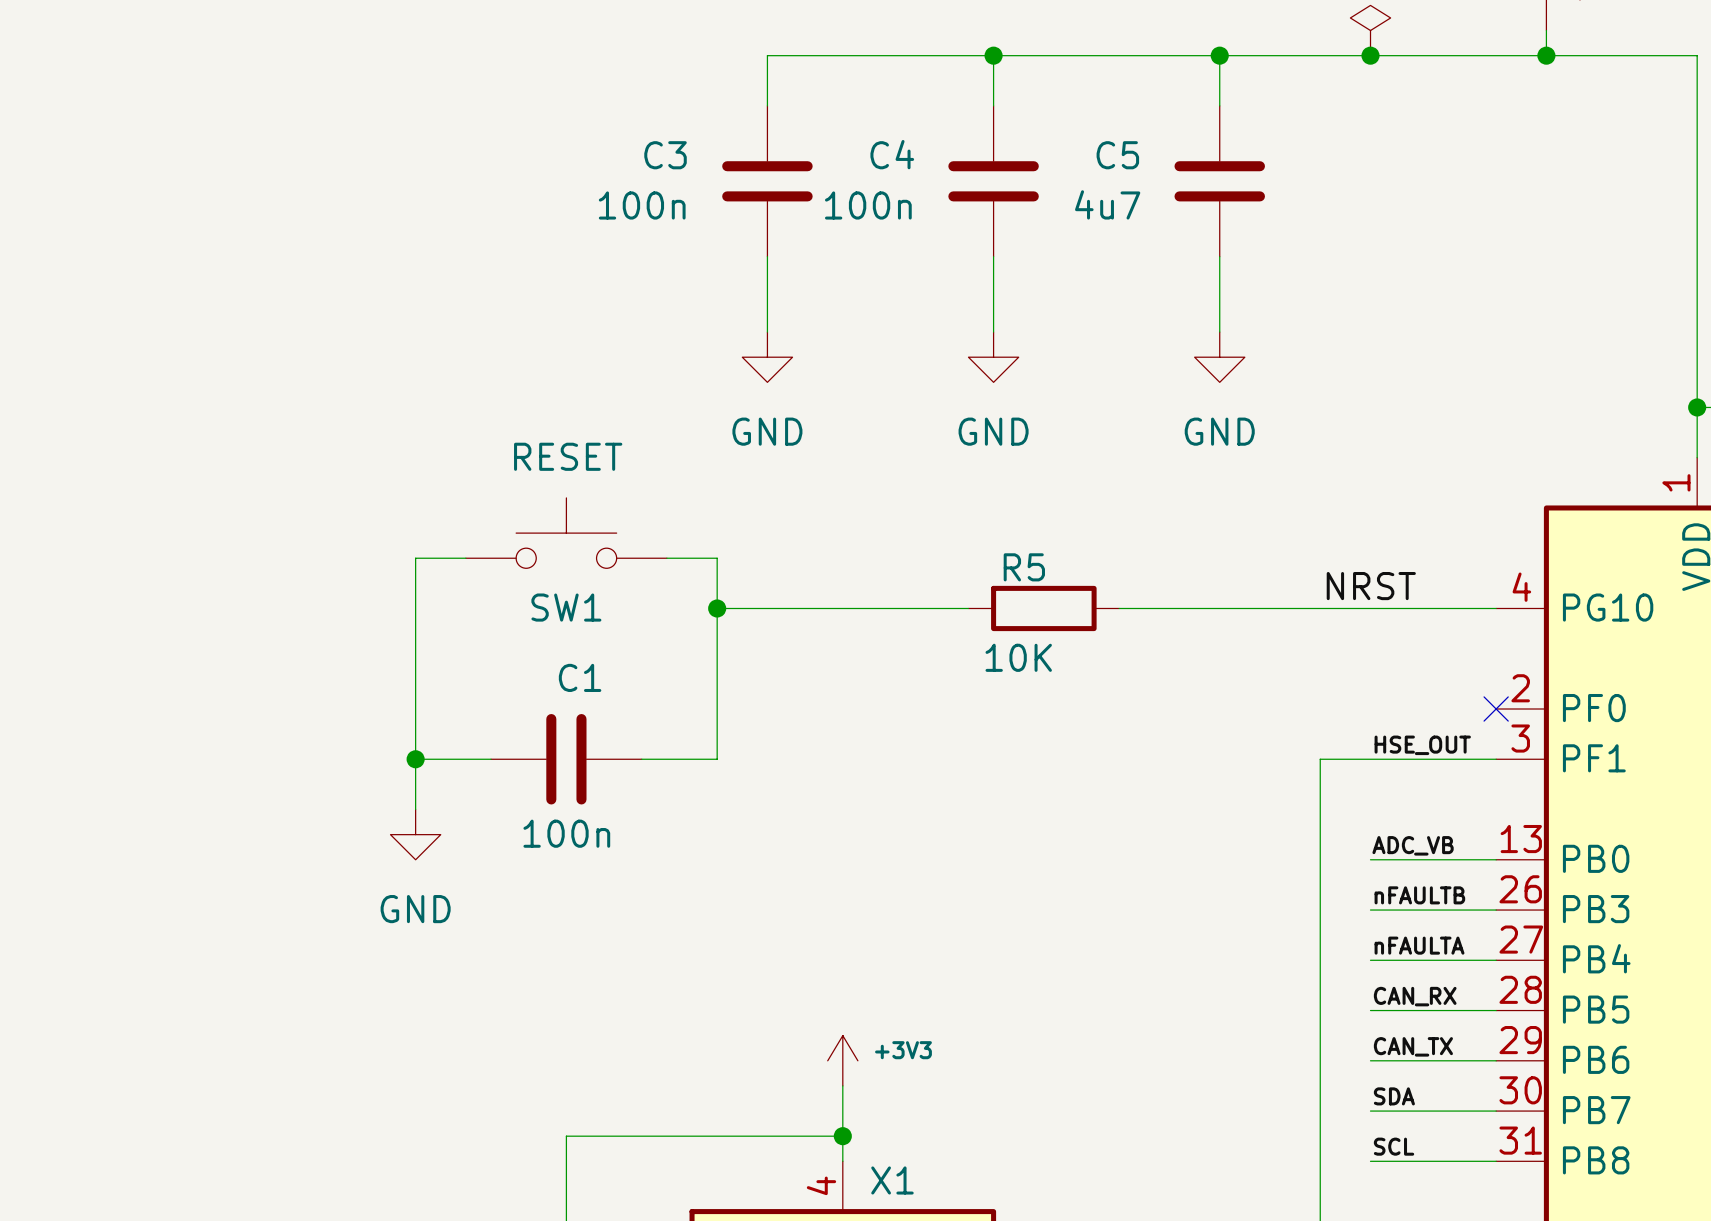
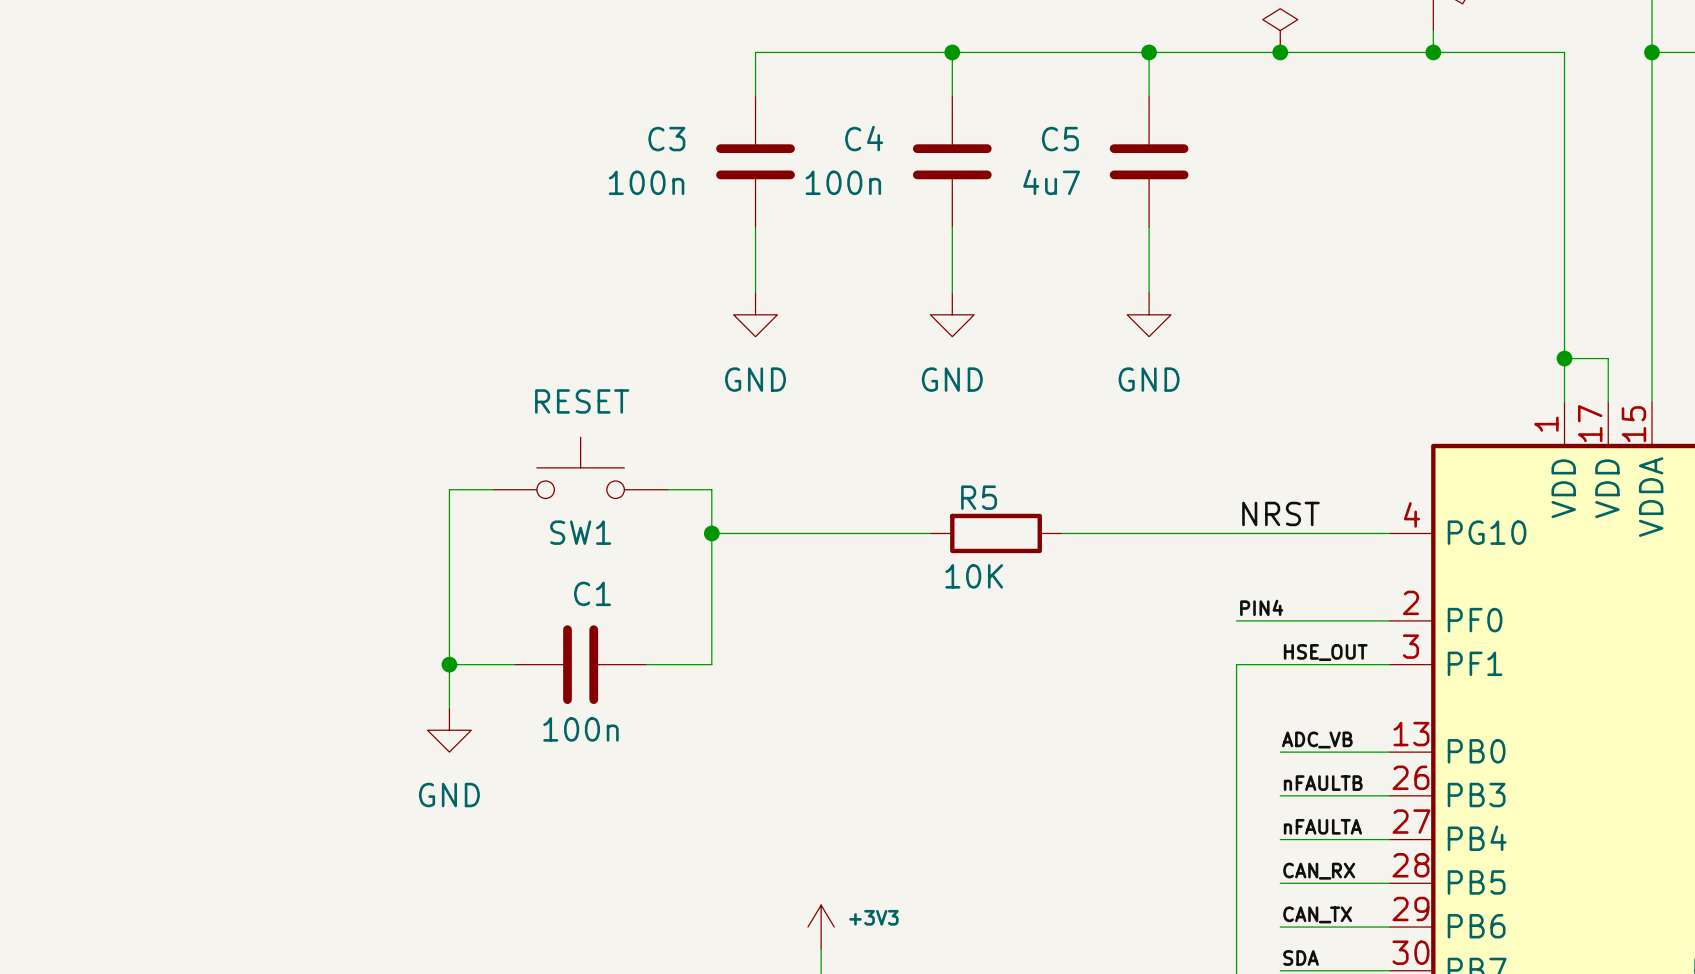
label: none -> PIN4 (1261, 607)
wire: none -> (1236, 620) (1389, 620)
no-connect mark: (1496, 709) -> none

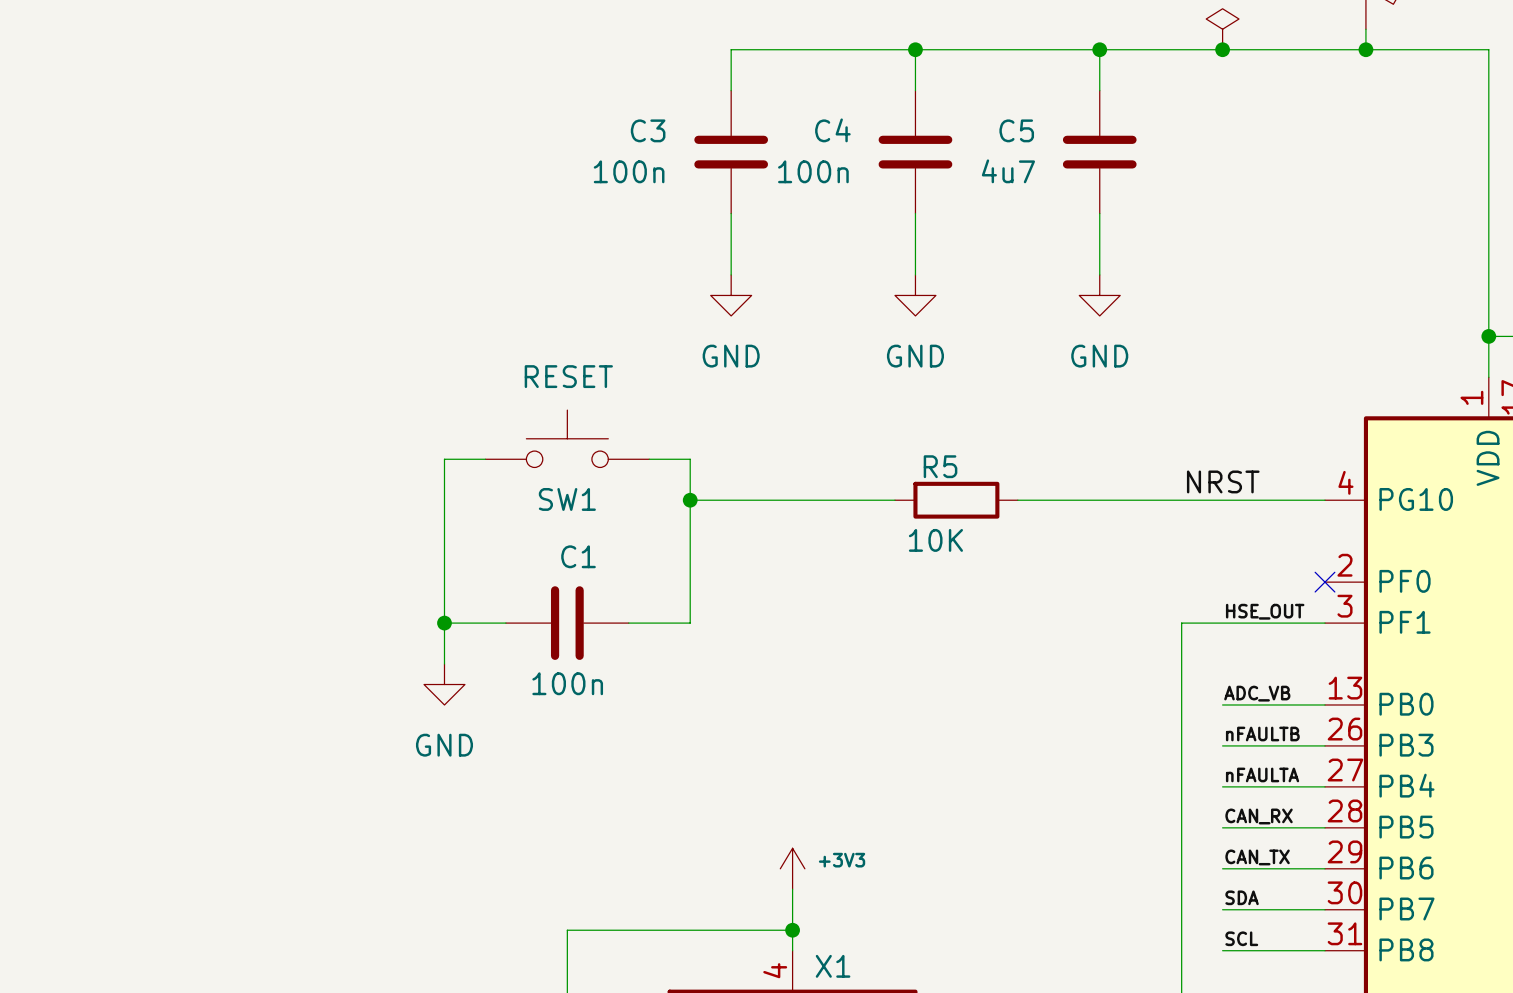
label: PIN4 (1261, 607) -> none
wire: (1236, 620) (1389, 620) -> none
no-connect mark: none -> (1324, 582)

